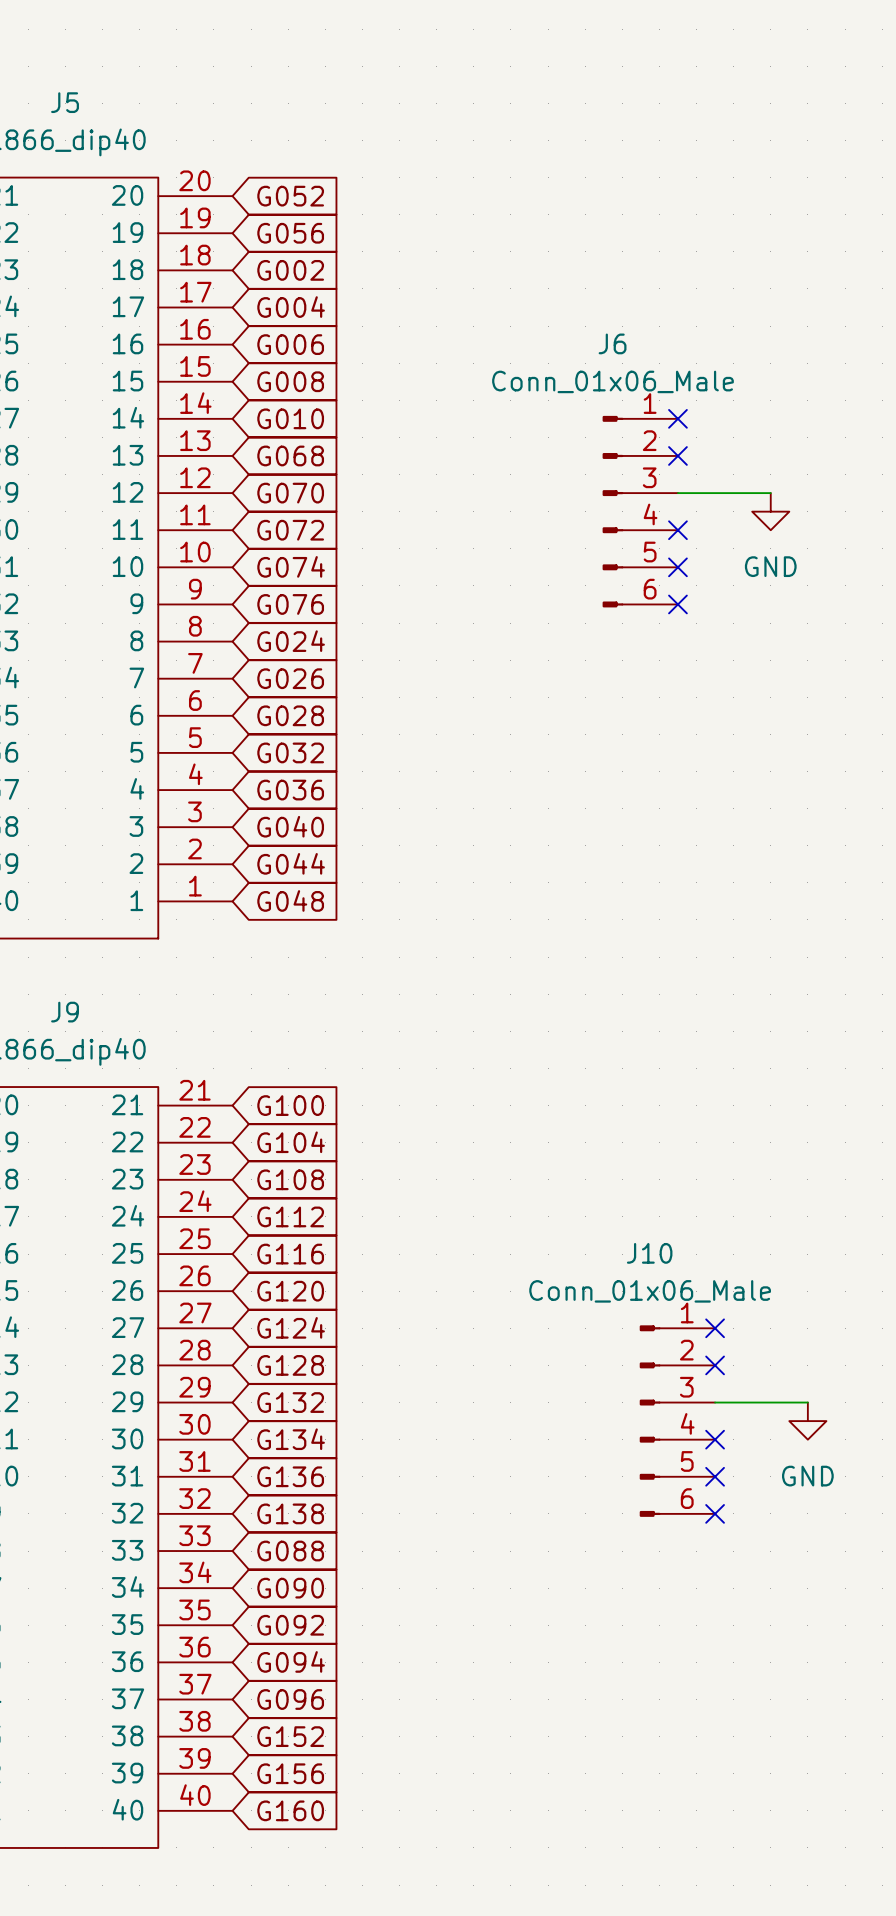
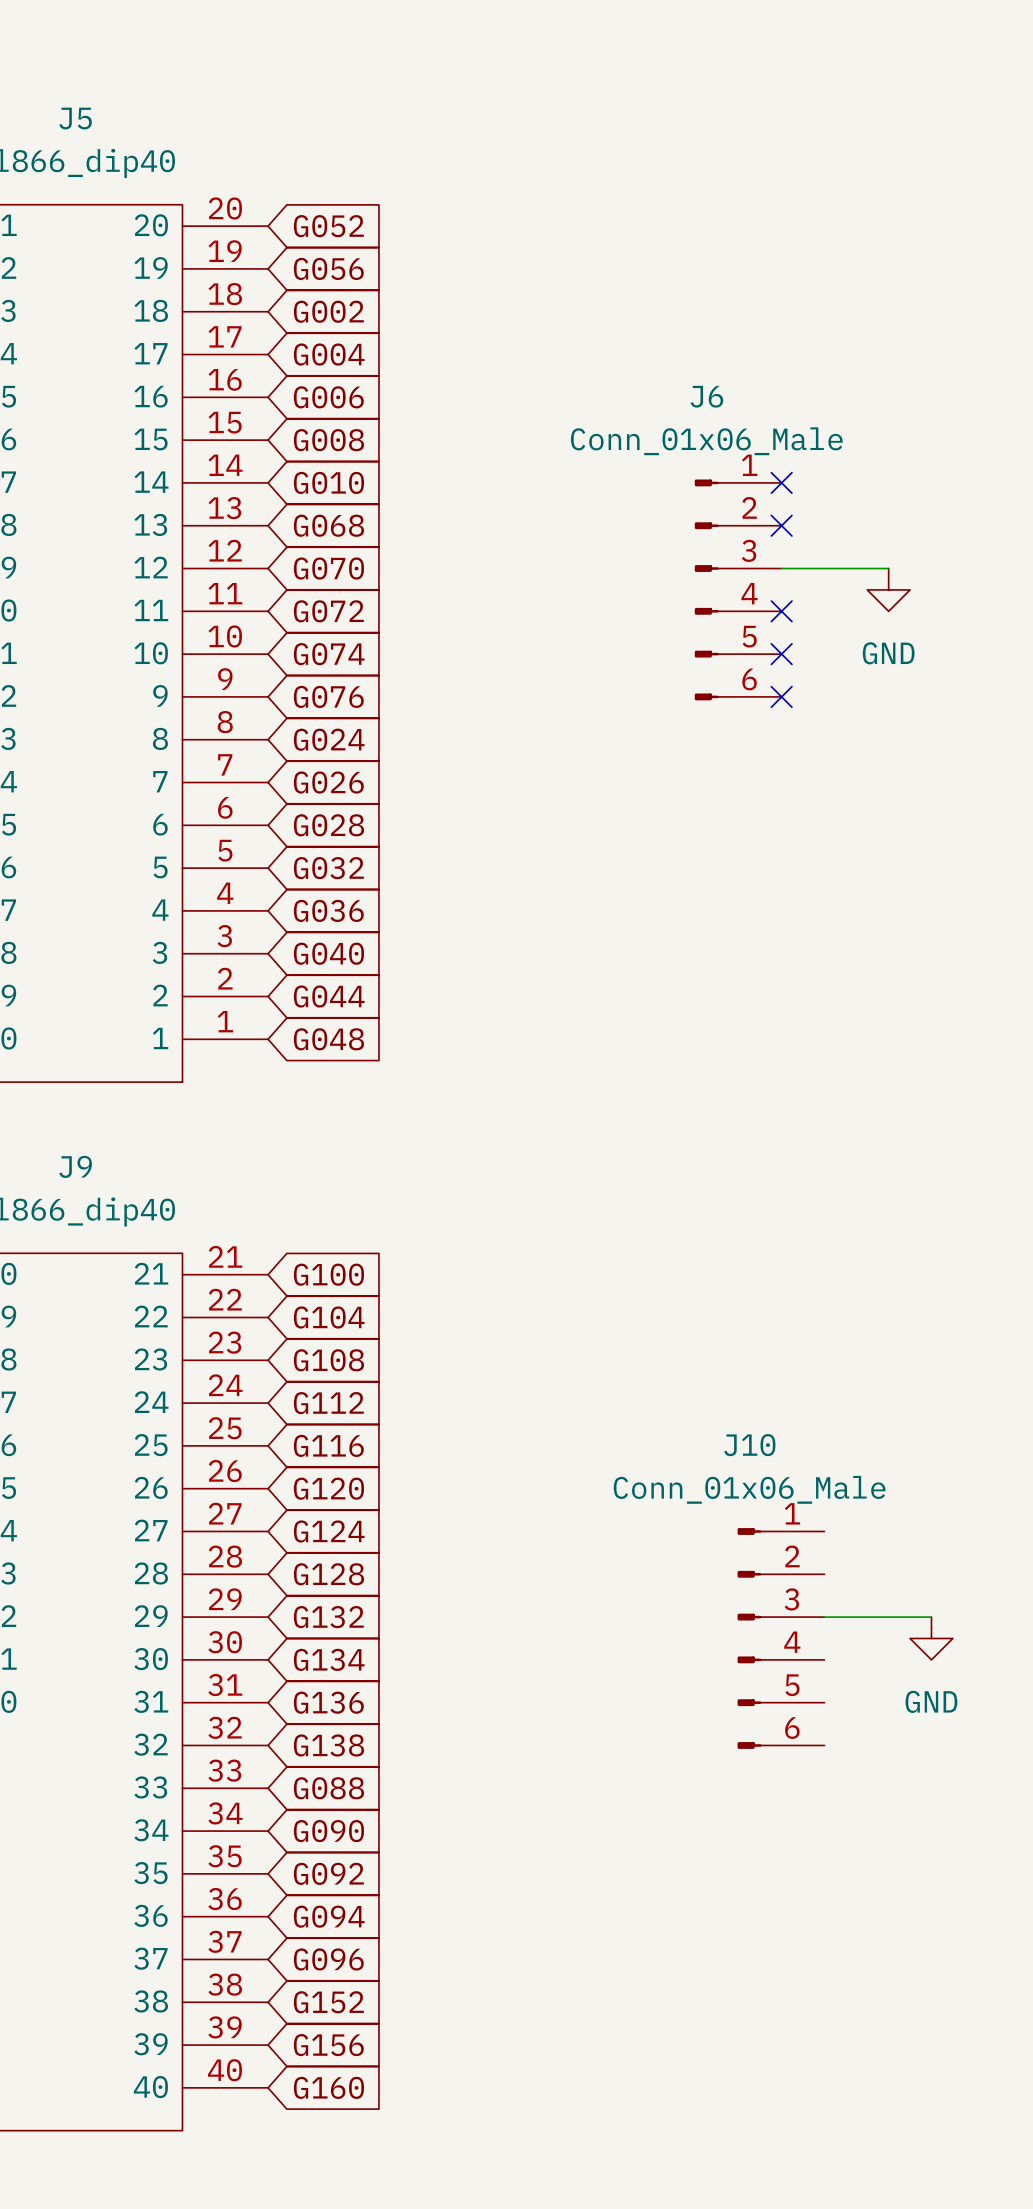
no-connect mark: (715, 1328) -> none
no-connect mark: (715, 1365) -> none
no-connect mark: (715, 1439) -> none
no-connect mark: (715, 1476) -> none
no-connect mark: (715, 1513) -> none

